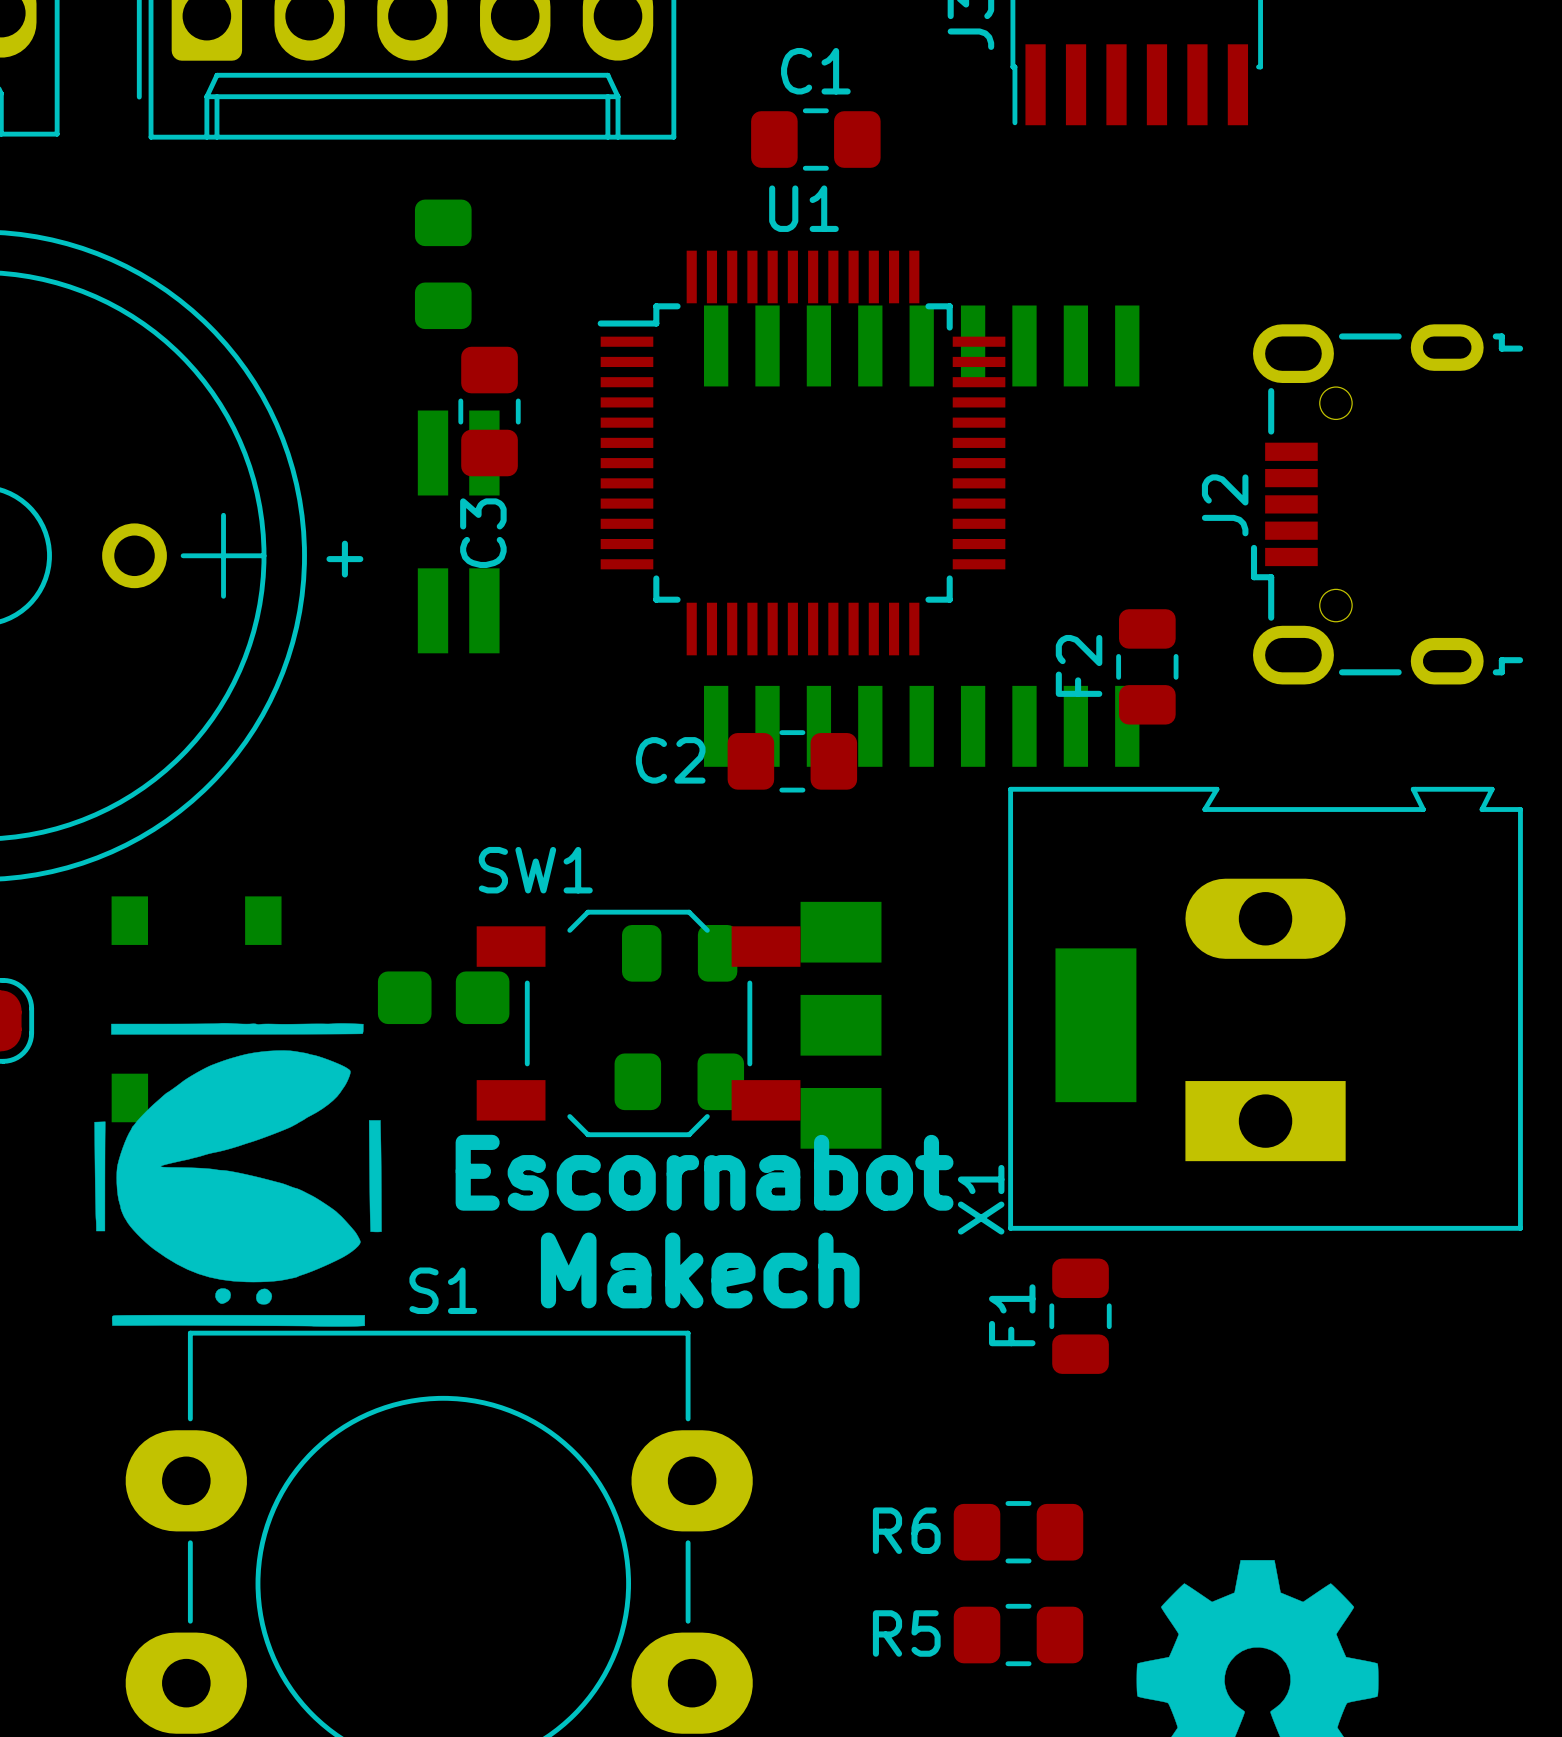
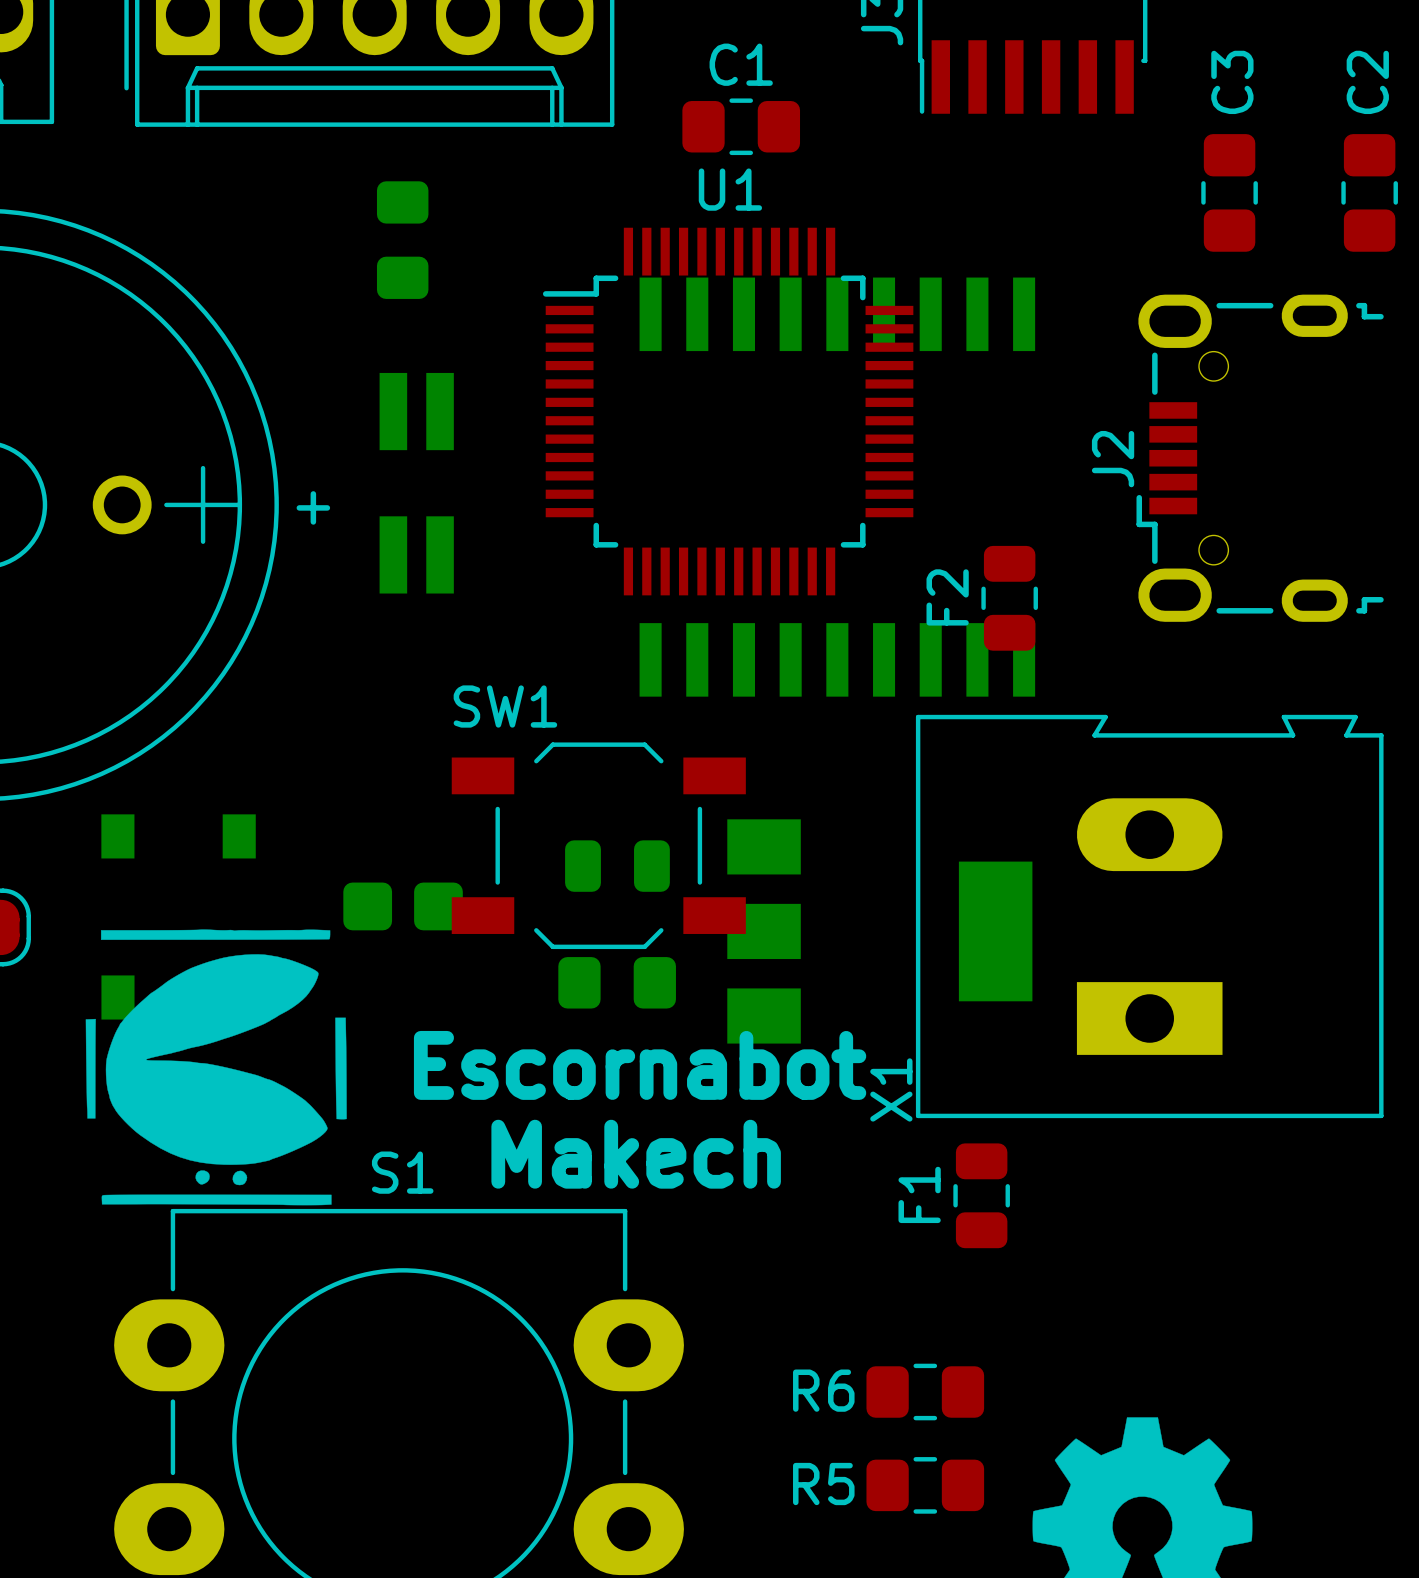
C3 position: (489, 411) -> (1229, 192)
C3 name position: C3 (483, 533) -> C3 (1232, 82)
F2 position: (1147, 666) -> (1009, 598)
C2 rotation: 0° (792, 761) -> 90° clockwise (1369, 192)
C2 position: (792, 761) -> (1369, 192)
SW1 position: (638, 1023) -> (598, 845)

